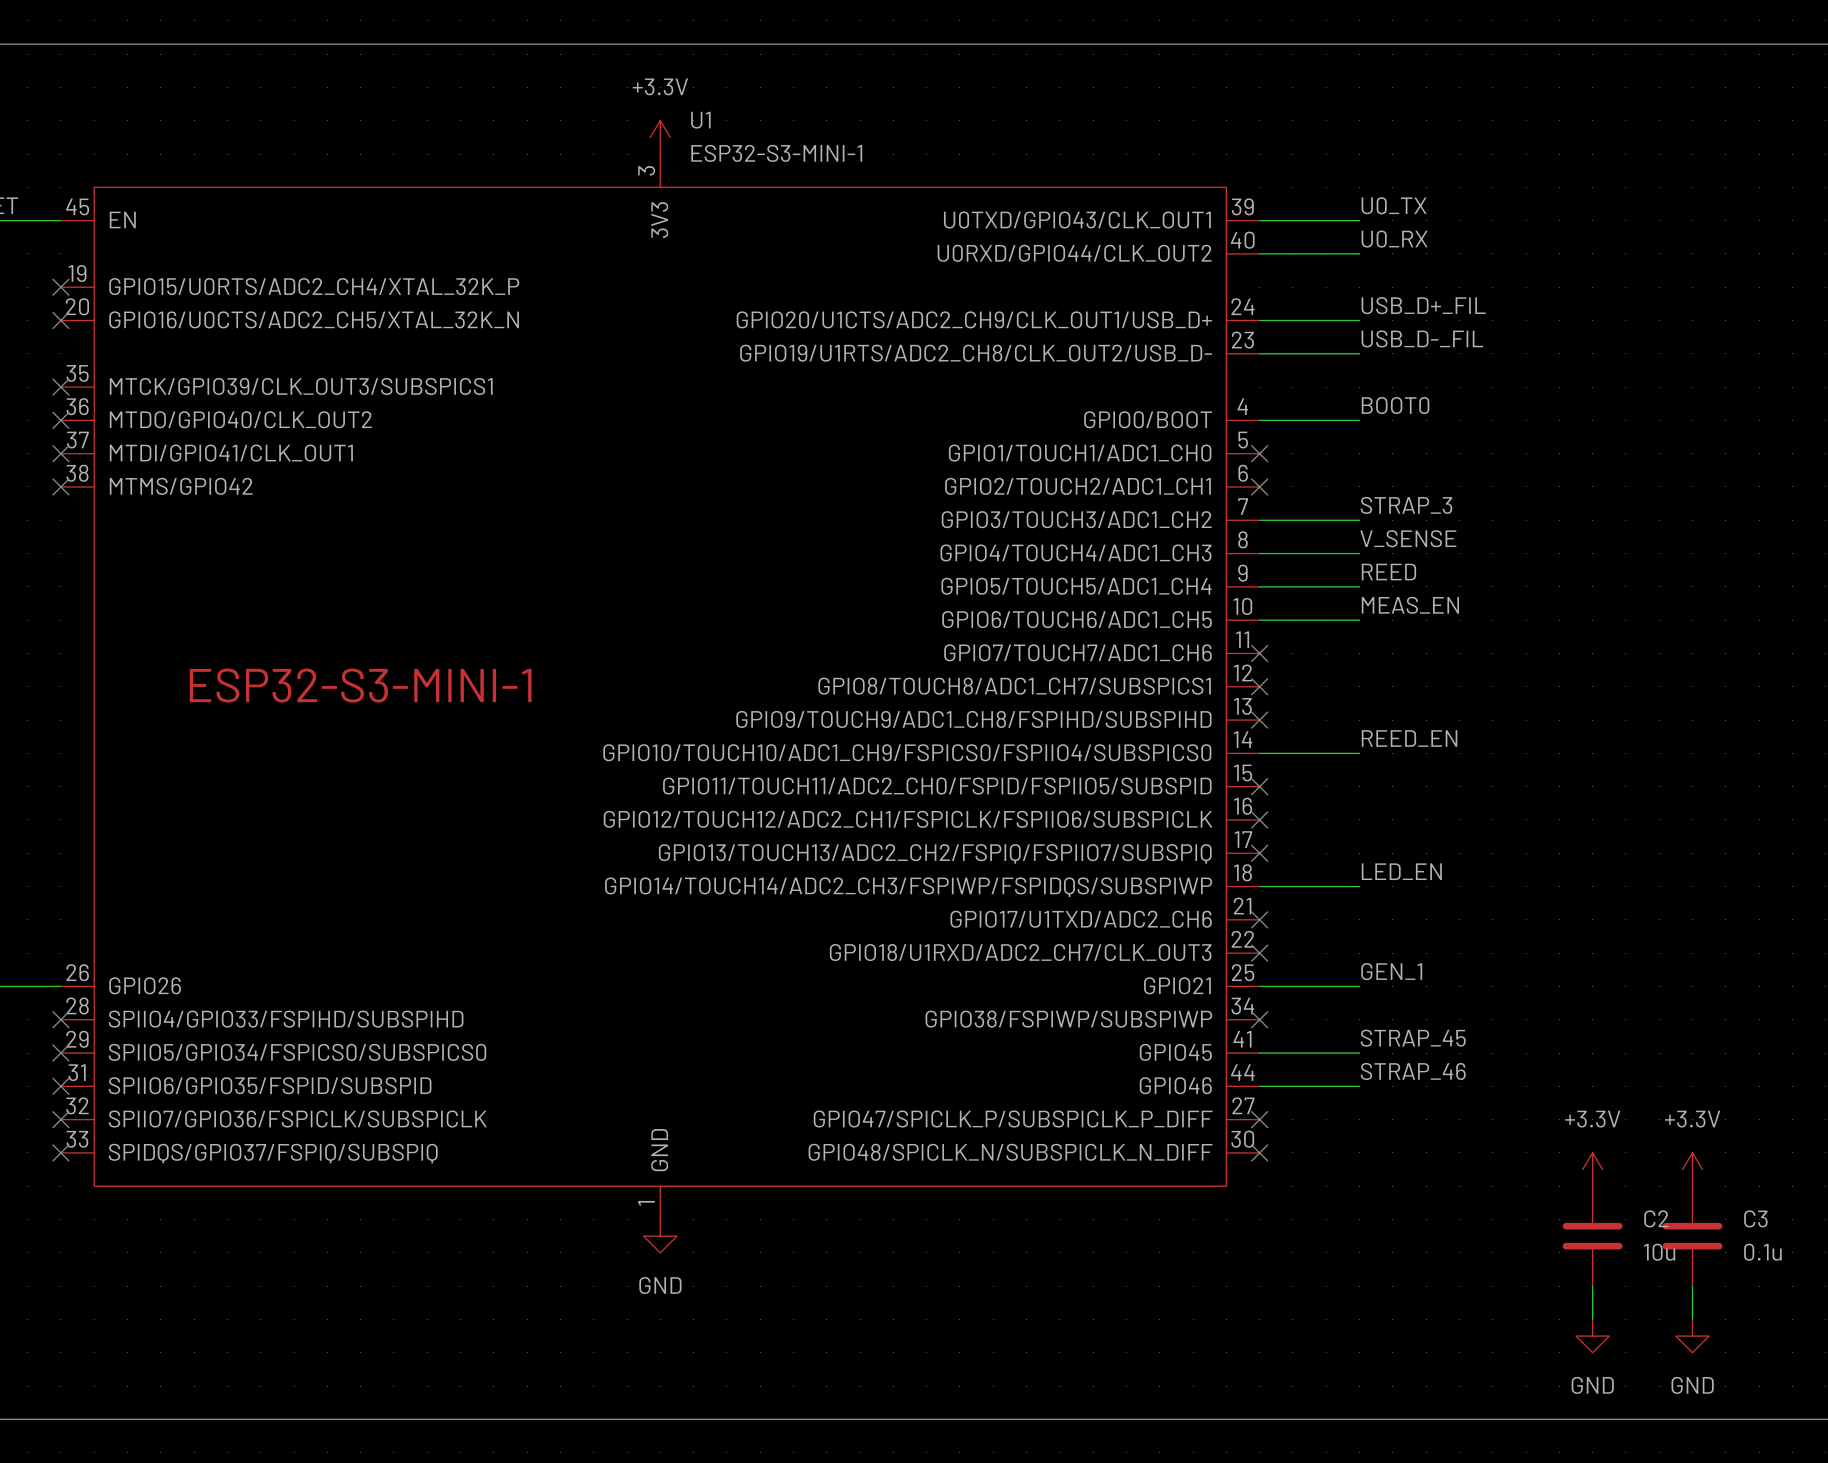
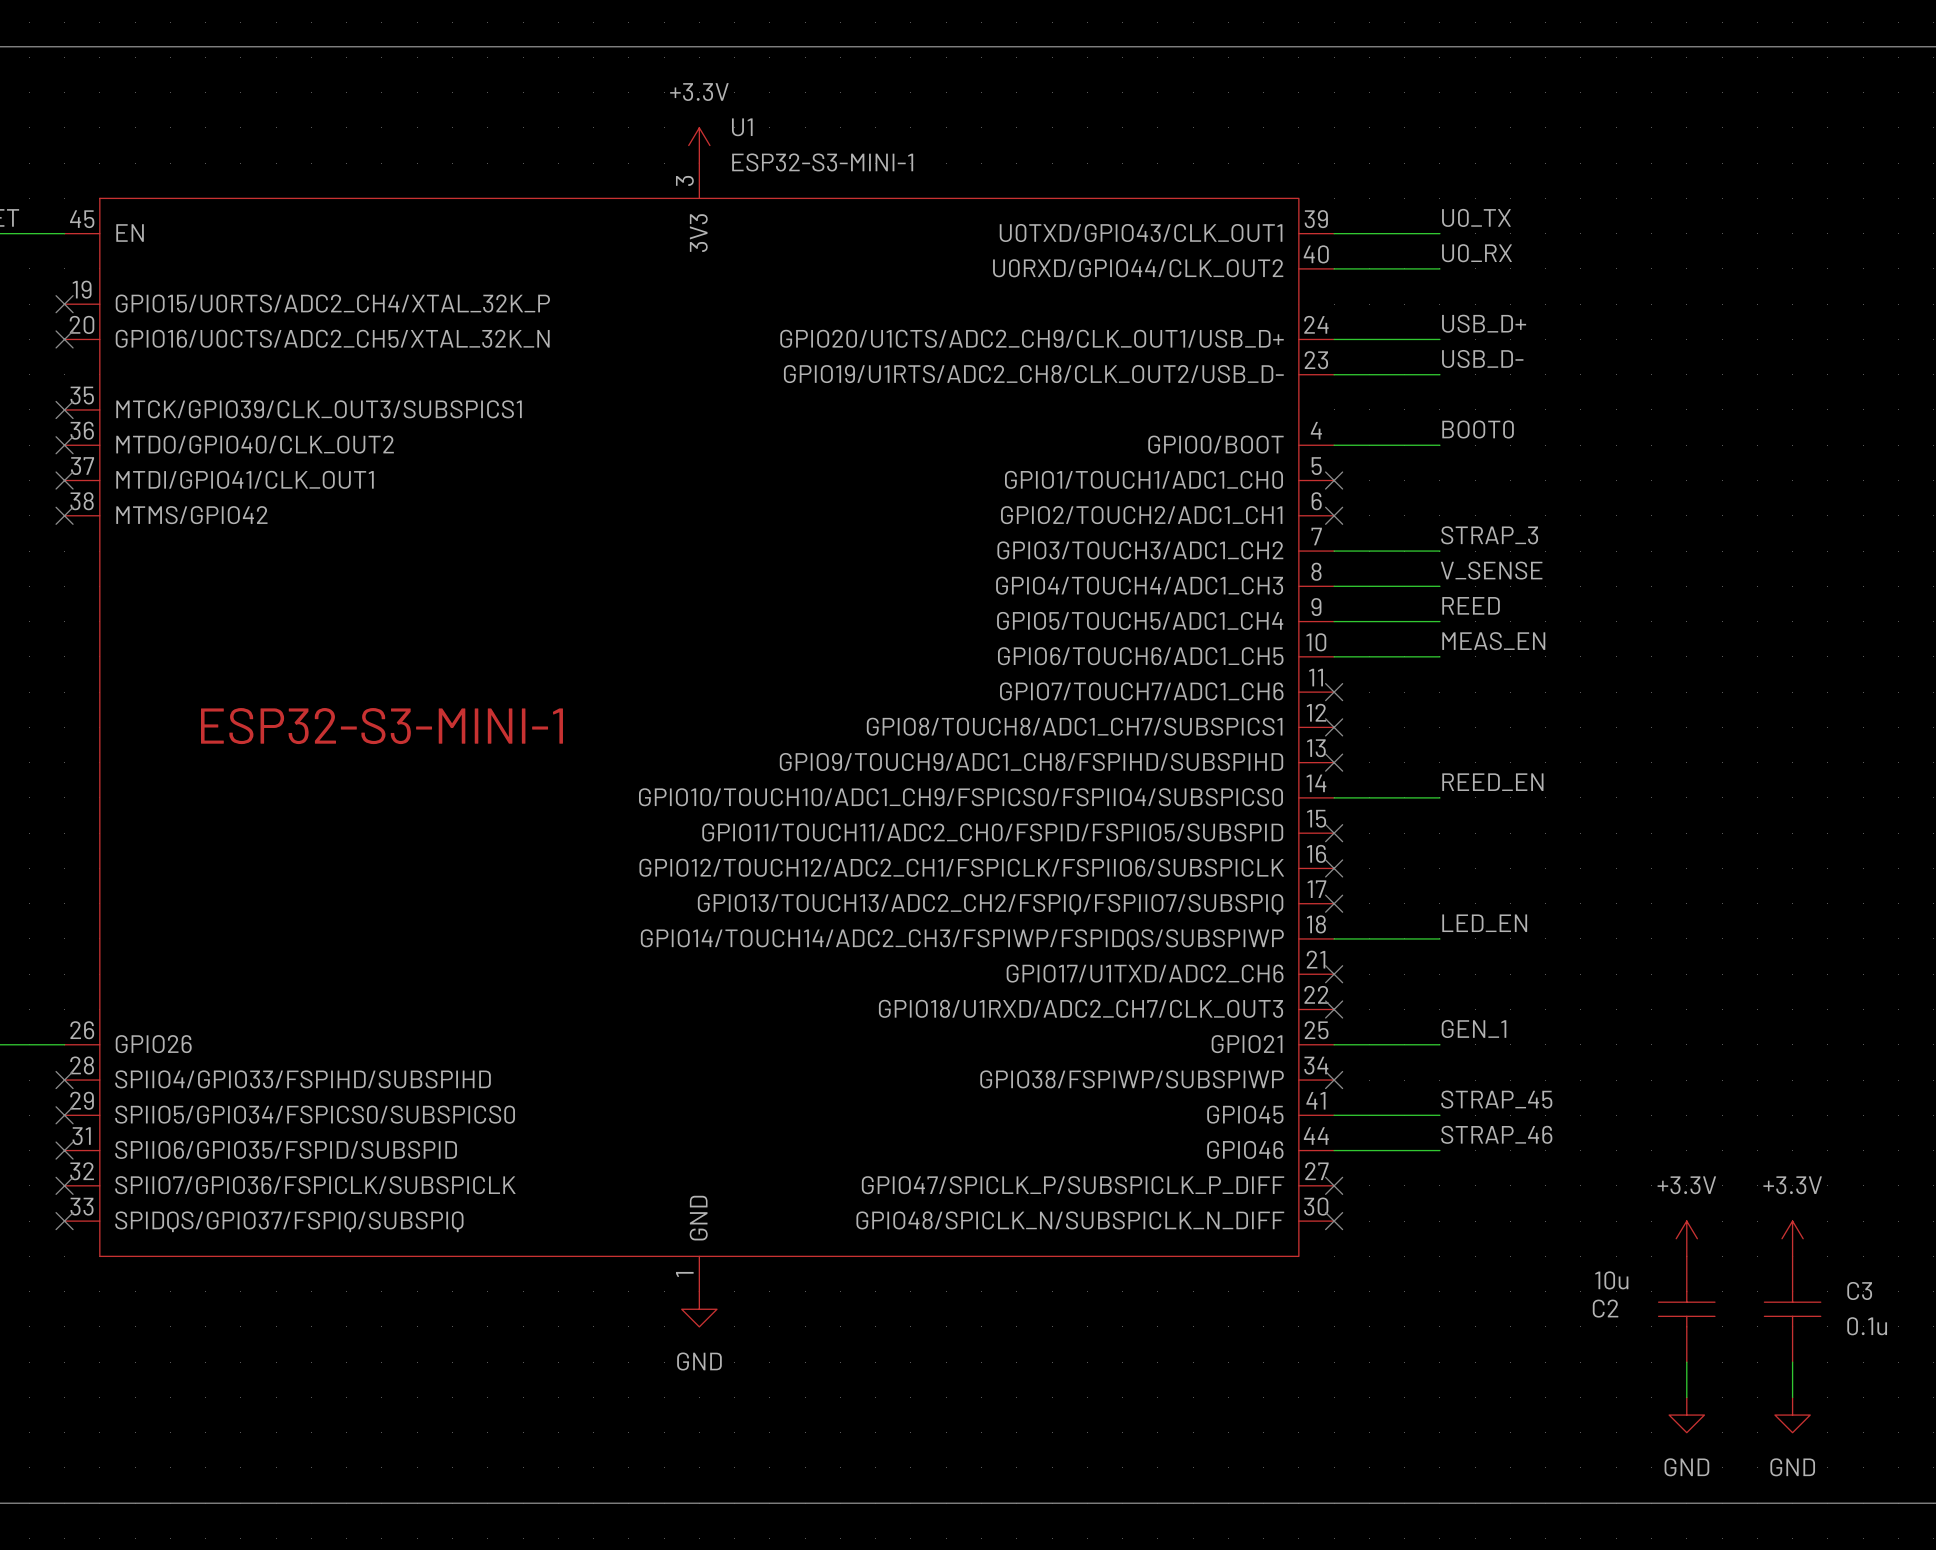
label: USB_D+_FIL (1423, 305) -> USB_D+ (1484, 323)
label: USB_D-_FIL (1422, 338) -> USB_D- (1482, 358)
C2 symbol: [1562, 1186, 1623, 1287] -> [1658, 1256, 1715, 1363]
C3 symbol: [1662, 1186, 1723, 1287] -> [1764, 1256, 1821, 1363]
C2 name position: C2 (1656, 1218) -> C2 (1605, 1308)
C2 value position: 10u (1659, 1252) -> 10u (1611, 1280)

